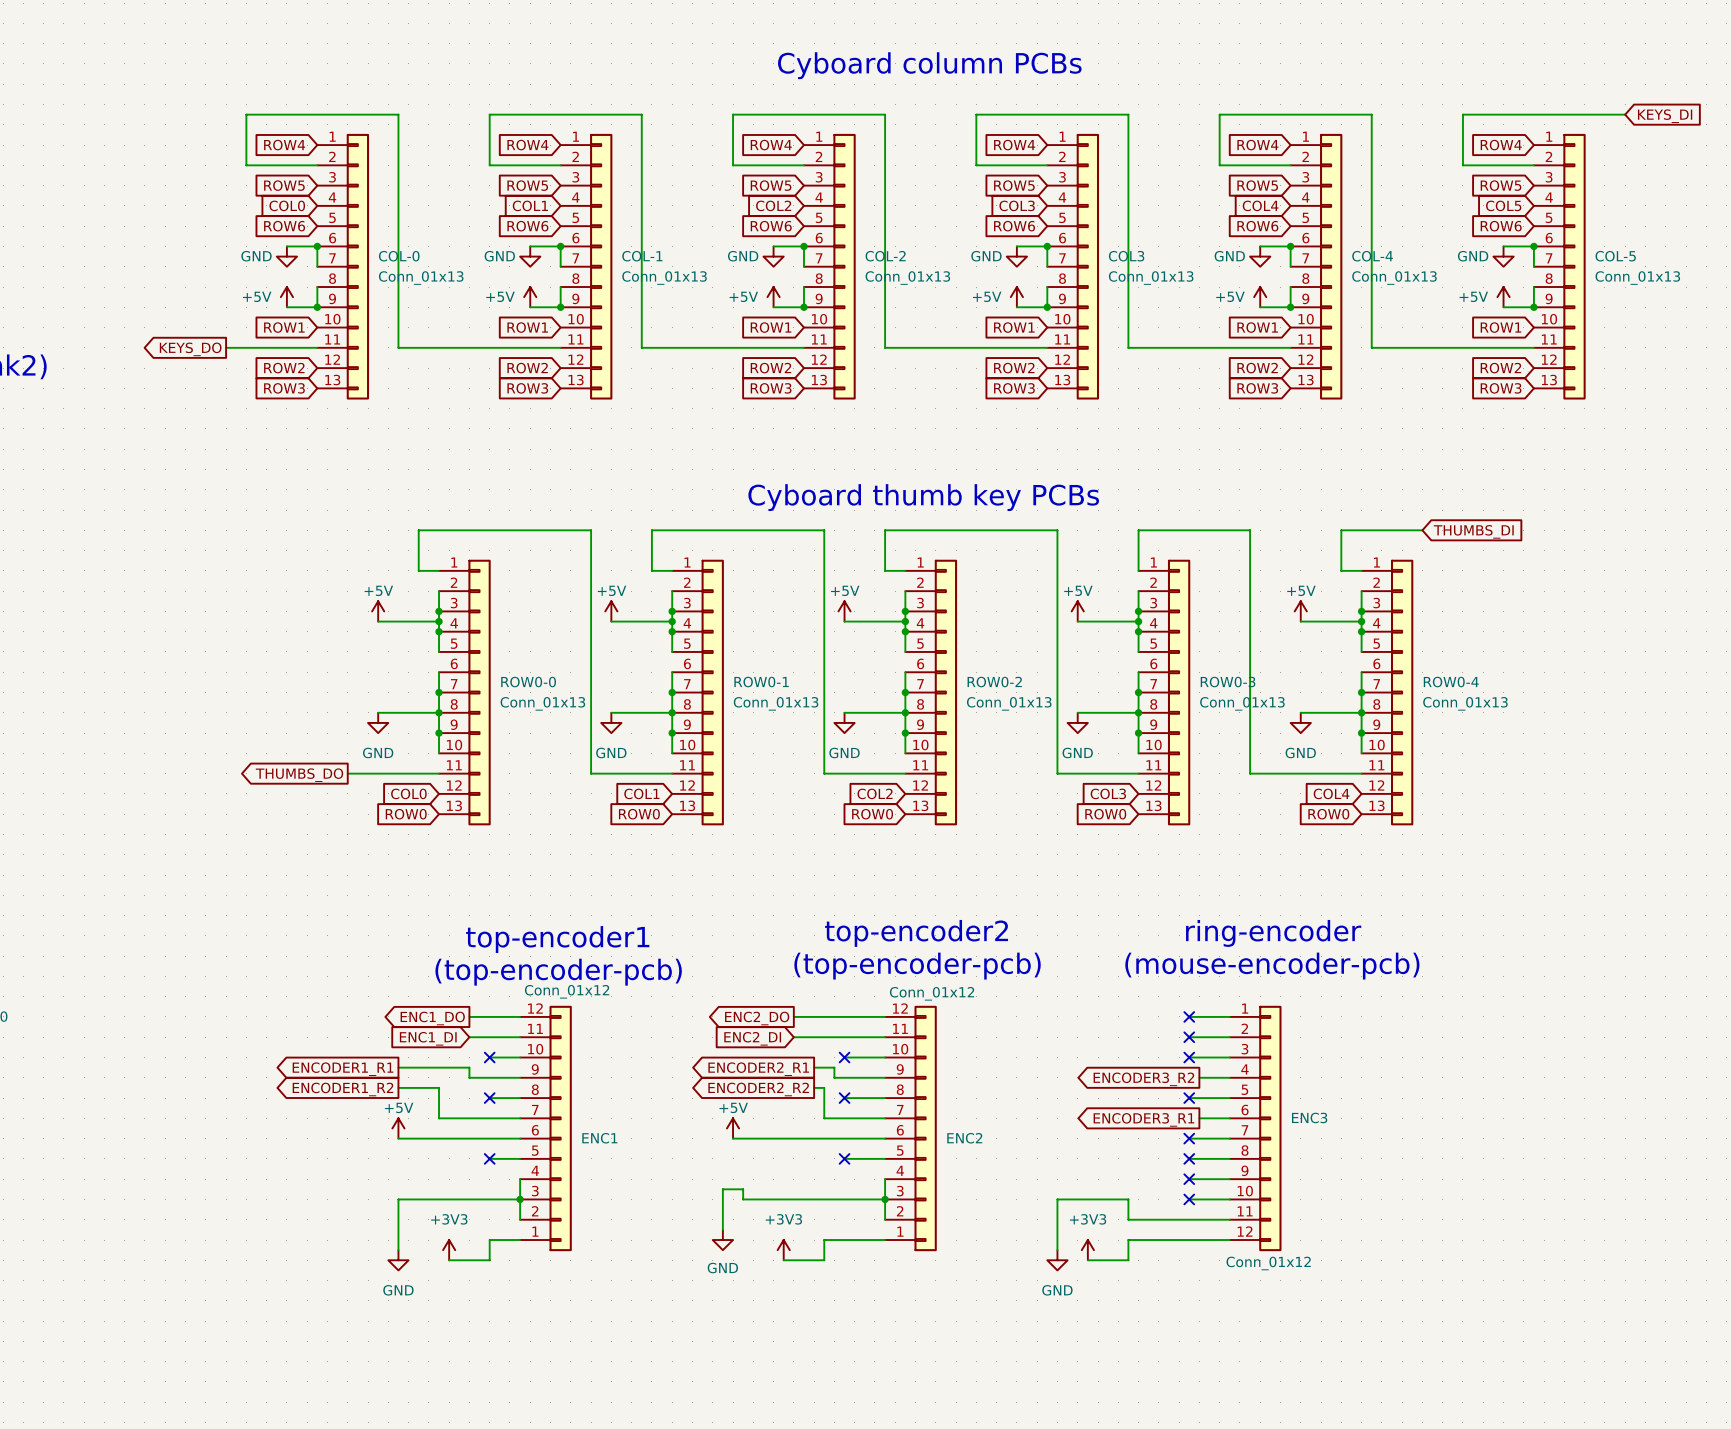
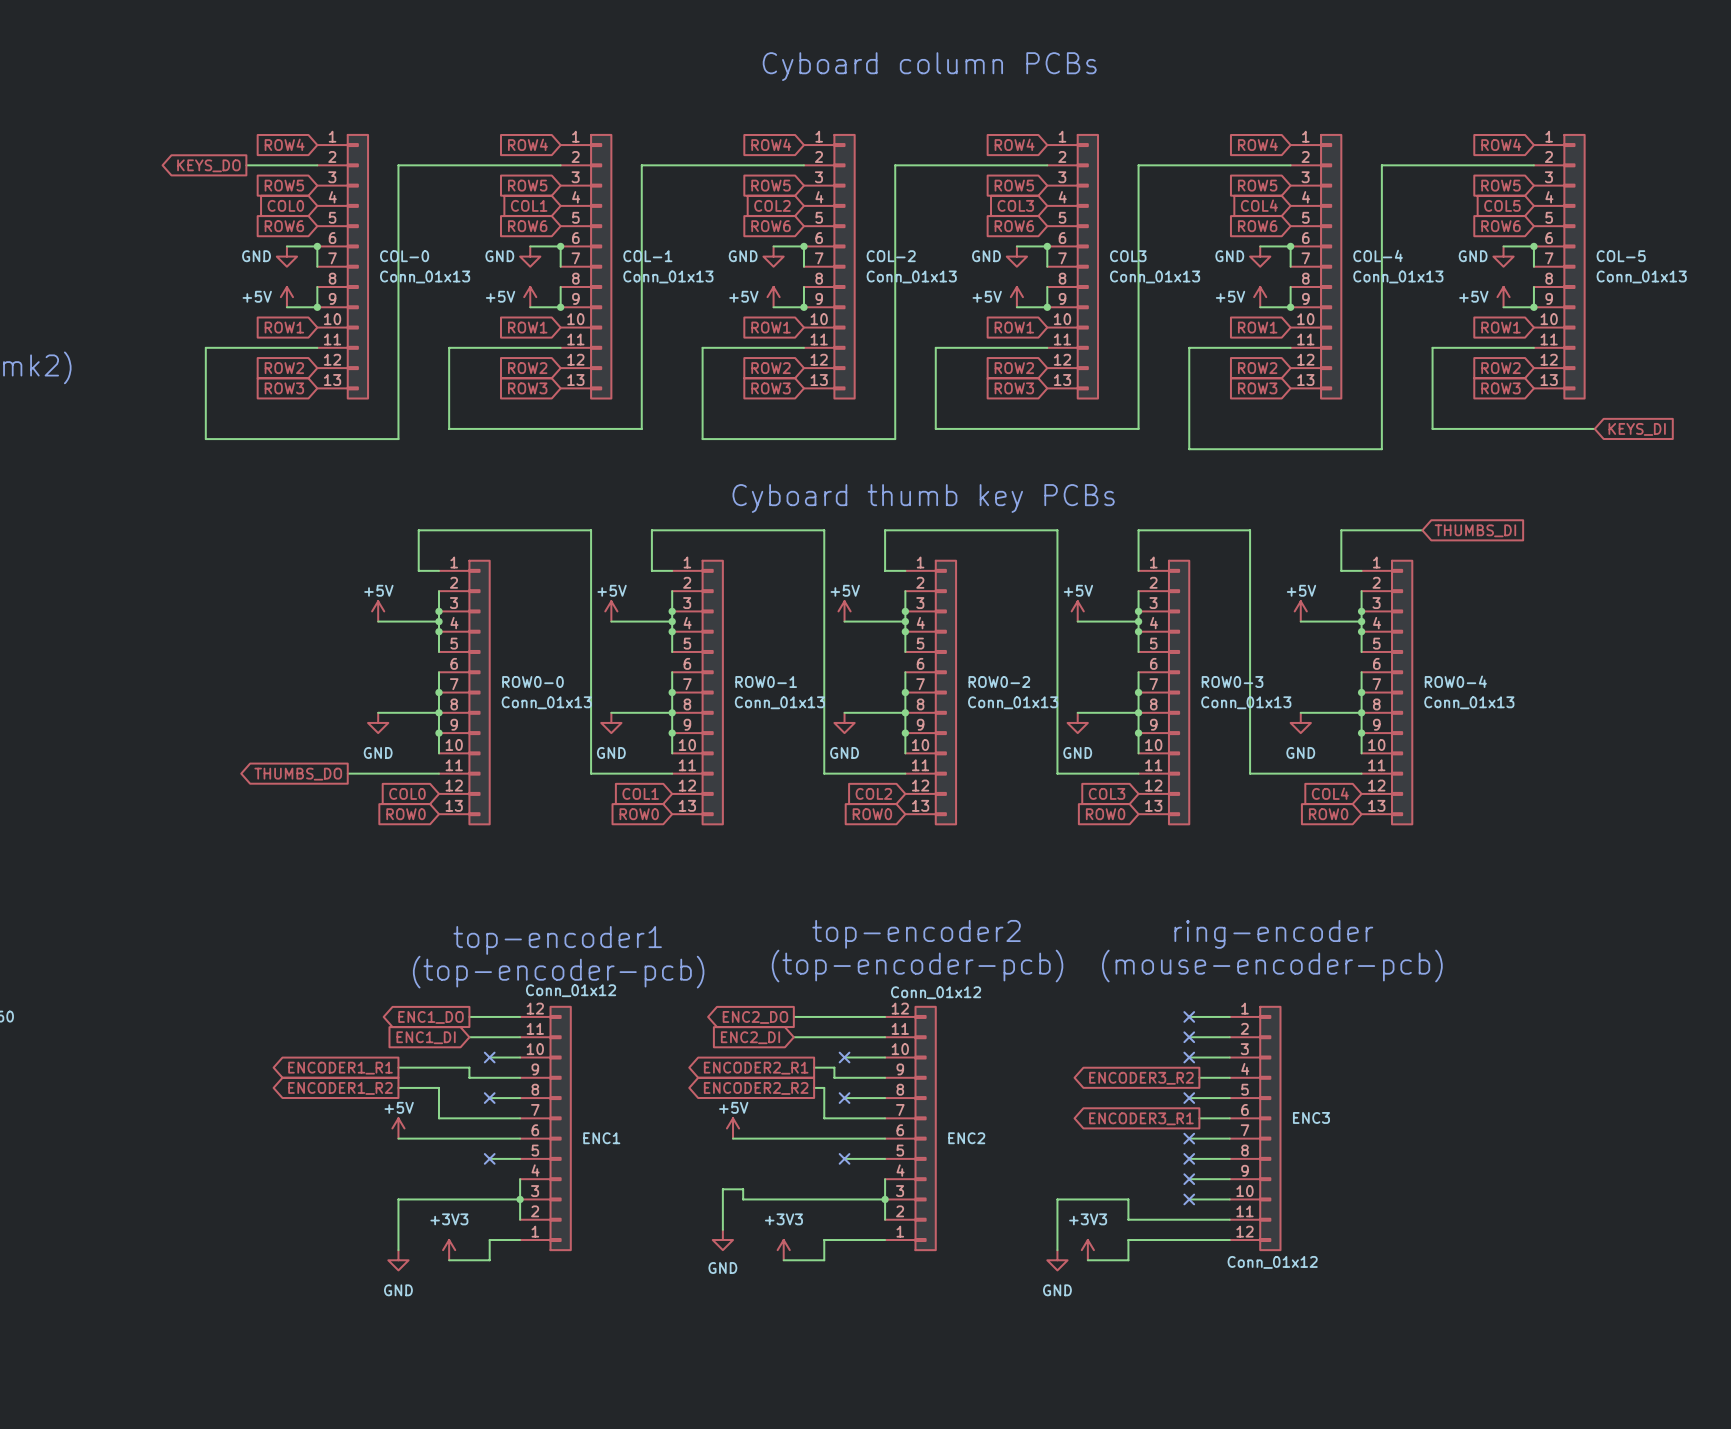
wire: (1625, 114) (1462, 114) (1462, 165) -> (1189, 347) (1189, 449) (1381, 449) (1381, 165) (1462, 165)
global label: KEYS_DI (1665, 116) -> none
wire: (246, 165) (246, 114) (398, 114) (398, 165) -> none
wire: (489, 165) (489, 114) (641, 114) (641, 165) -> (489, 165) (398, 165)
wire: (733, 165) (733, 114) (885, 114) (885, 347) (935, 347) -> (733, 165) (641, 165)
wire: (976, 165) (976, 114) (1128, 114) (1128, 347) (1189, 347) -> (976, 165) (895, 165) (895, 439) (702, 439) (702, 347)
wire: (1219, 165) (1219, 114) (1371, 114) (1371, 347) (1432, 347) -> (1594, 428) (1432, 428) (1432, 347)
wire: none -> (1219, 165) (1138, 165) (1138, 428) (935, 428) (935, 347)
wire: (398, 347) (449, 347) -> (398, 347) (398, 439) (205, 439) (205, 347) (226, 347)
wire: (641, 347) (702, 347) -> (641, 347) (641, 428) (449, 428) (449, 347)
global label position: KEYS_DO (190, 349) -> KEYS_DO (208, 165)
global label: none -> KEYS_DI (1637, 429)

